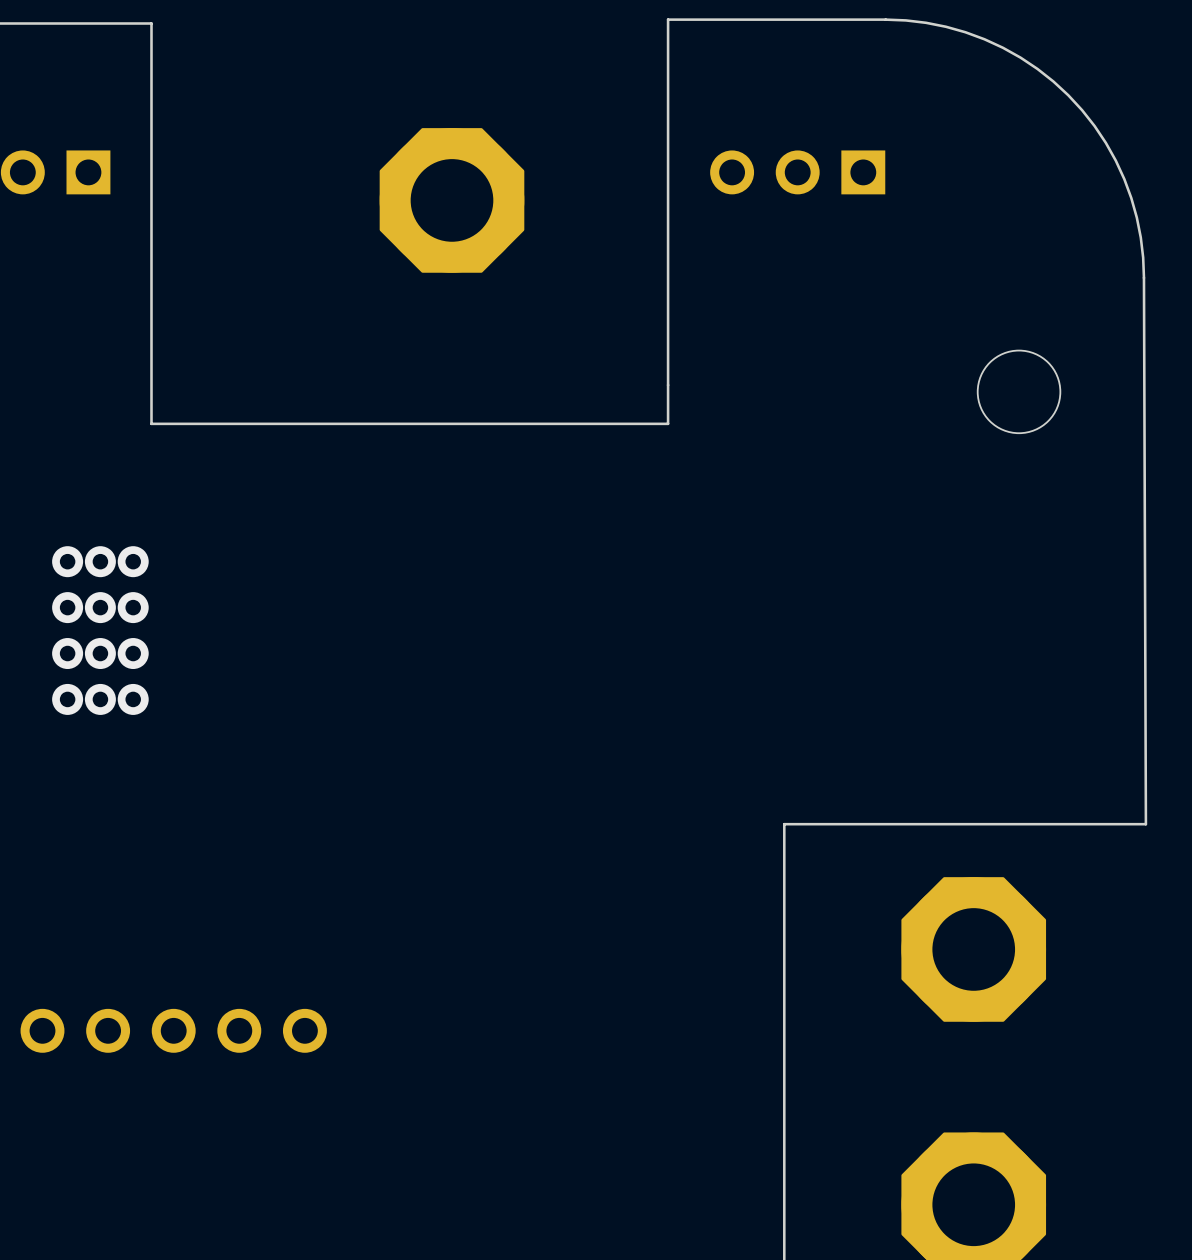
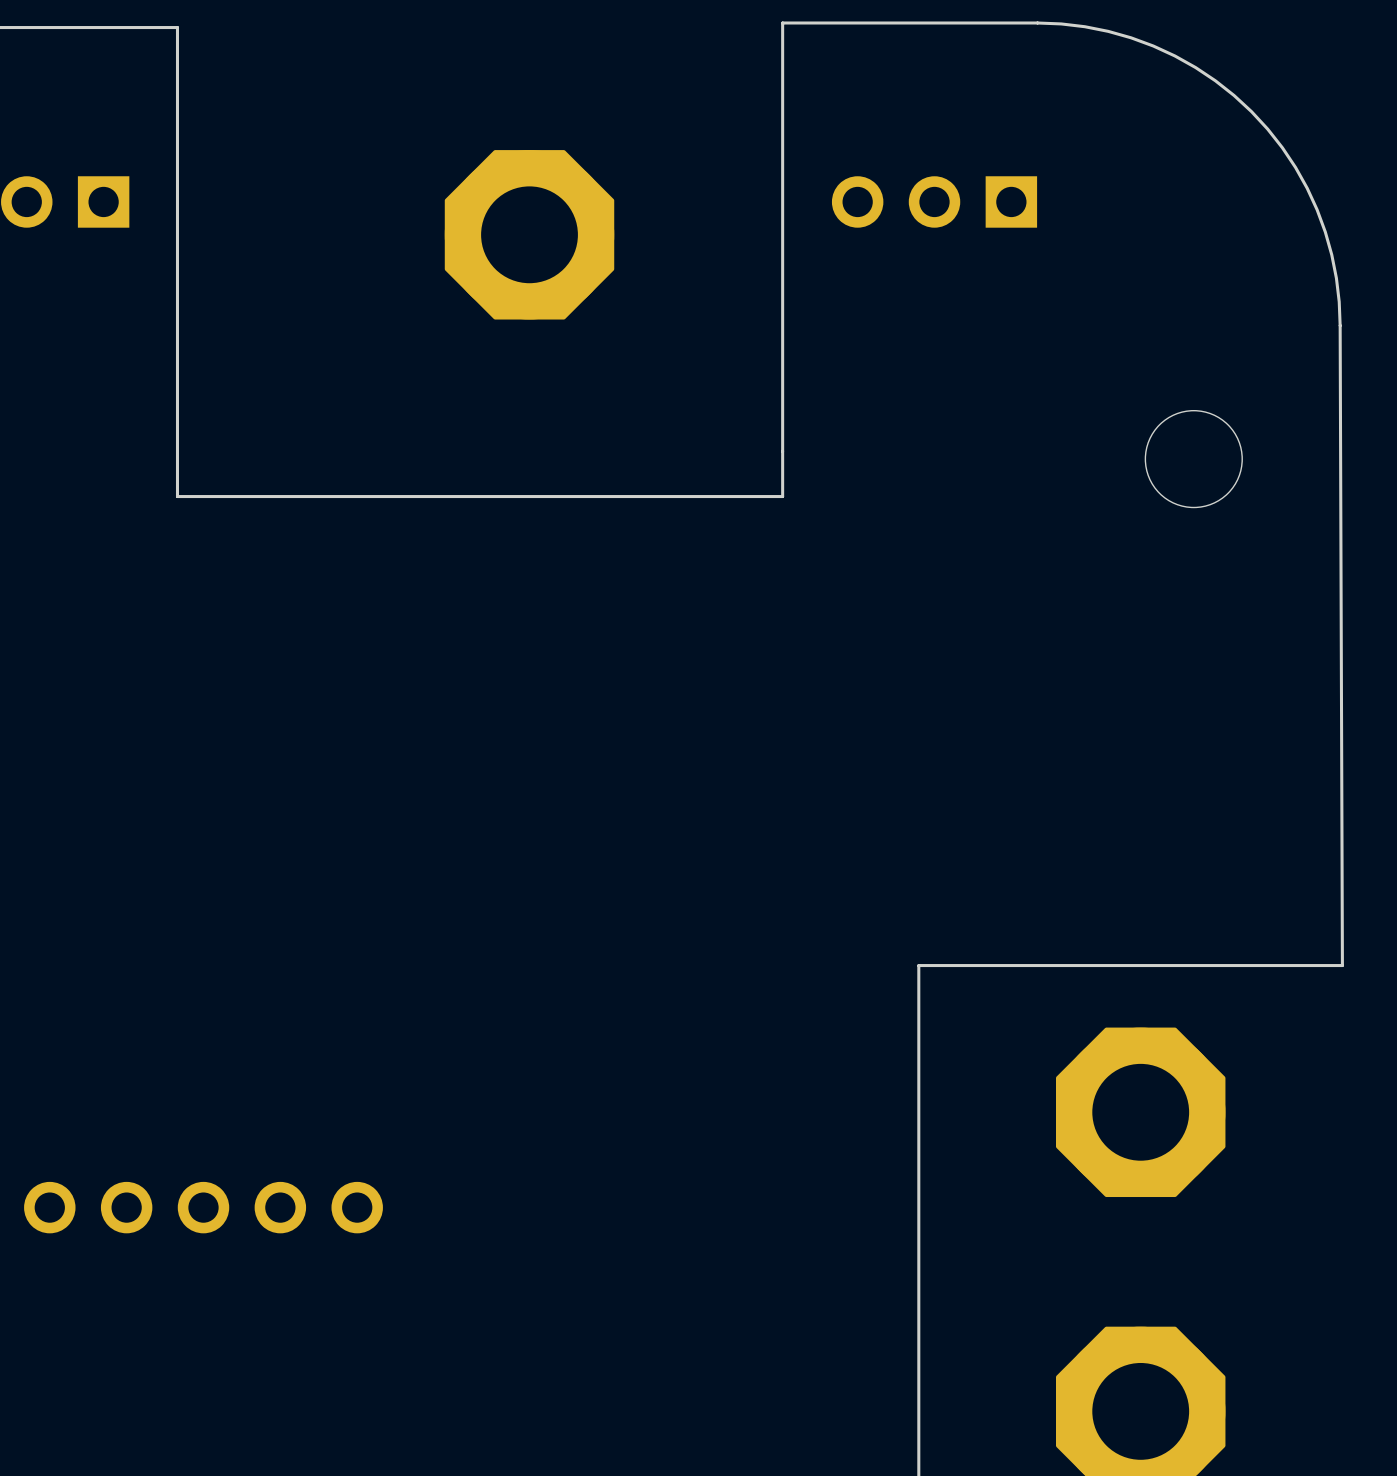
via: (67, 561) -> none
via: (100, 561) -> none
via: (133, 561) -> none
via: (67, 607) -> none
via: (100, 607) -> none
via: (133, 607) -> none
via: (67, 653) -> none
via: (100, 653) -> none
via: (133, 653) -> none
via: (67, 699) -> none
via: (100, 699) -> none
via: (133, 699) -> none

